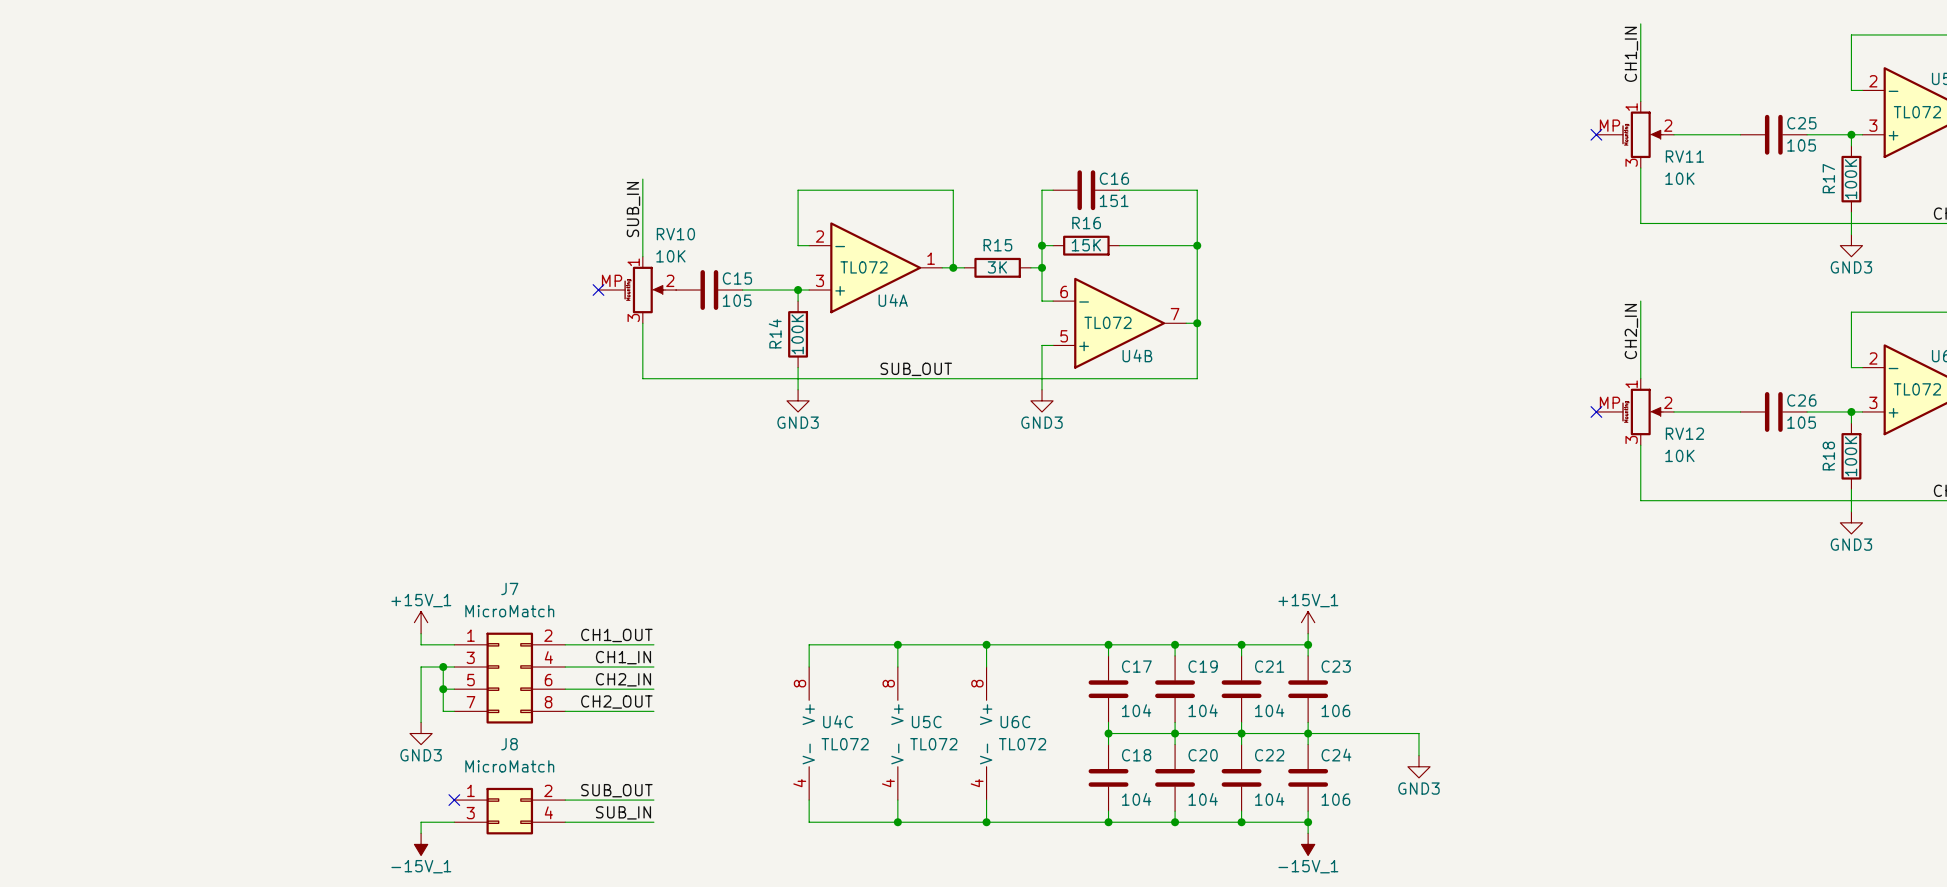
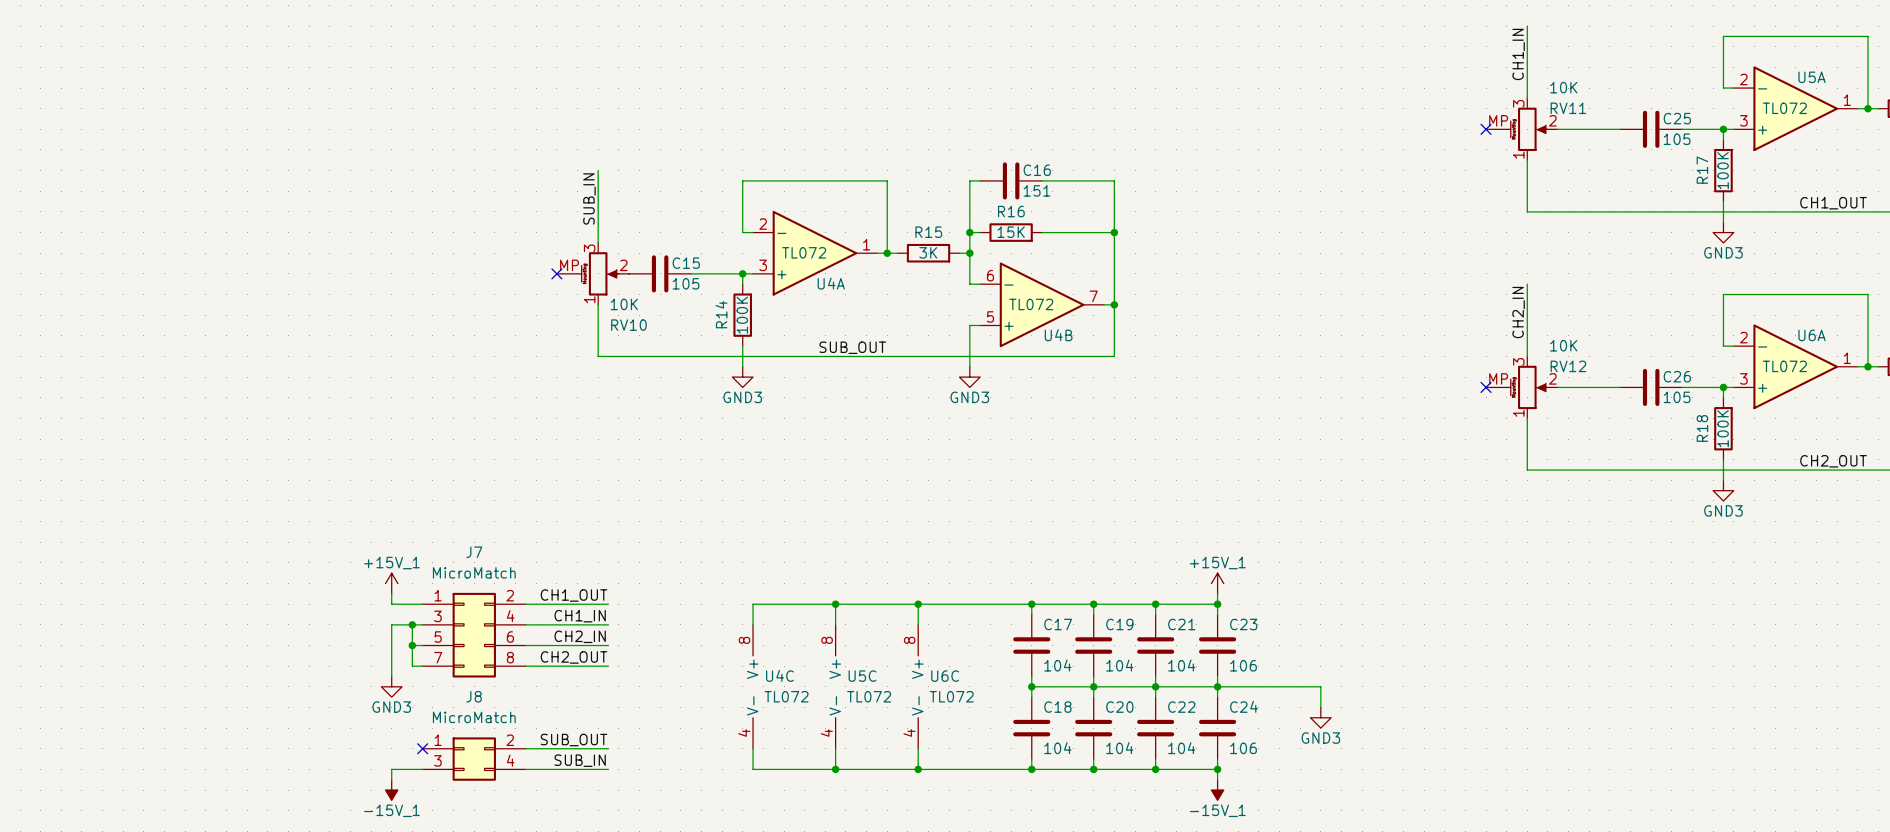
RV11 flip: as is (1642, 134) -> up-down (1529, 129)
RV10 flip: as is (644, 290) -> up-down (599, 273)
RV12 flip: as is (1642, 411) -> up-down (1529, 387)

